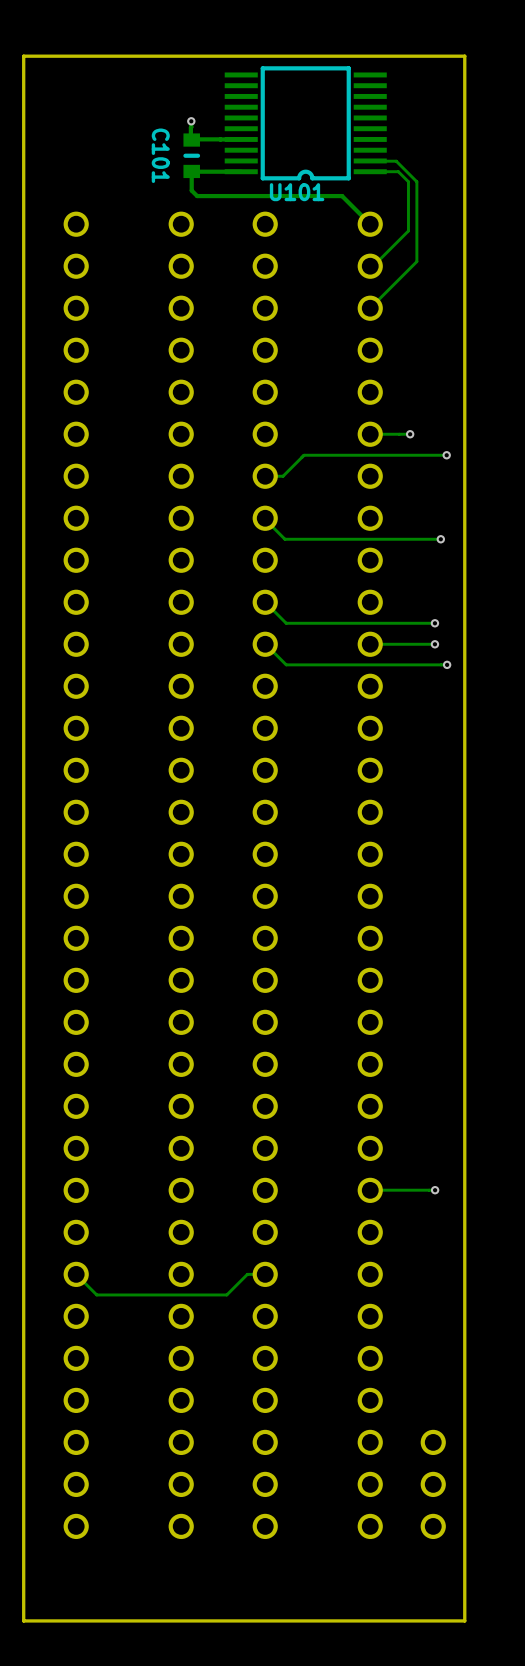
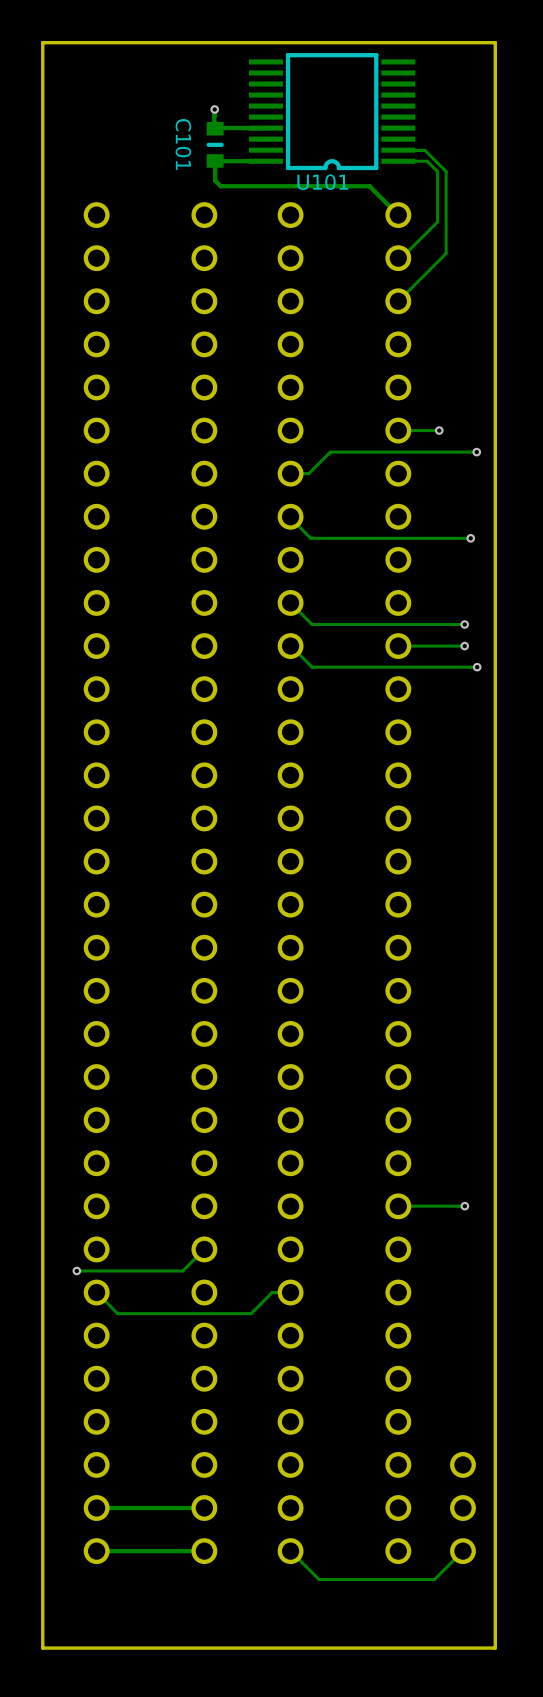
track: none -> (204, 1249) (182, 1270) (76, 1270)
via: none -> (76, 1270)
track: none -> (204, 1508) (96, 1508)
track: none -> (204, 1551) (96, 1551)
track: none -> (462, 1551) (434, 1579) (319, 1579) (290, 1551)

